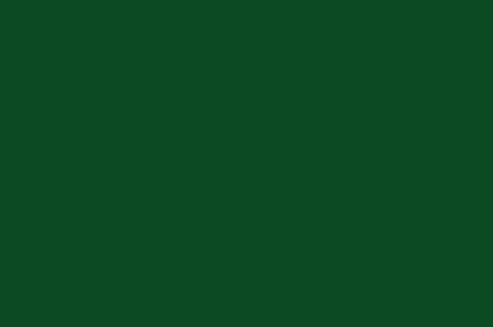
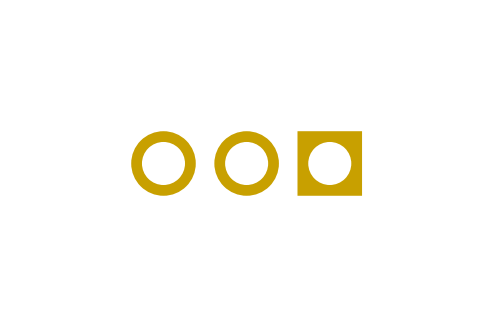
part: none -> (246, 163)

